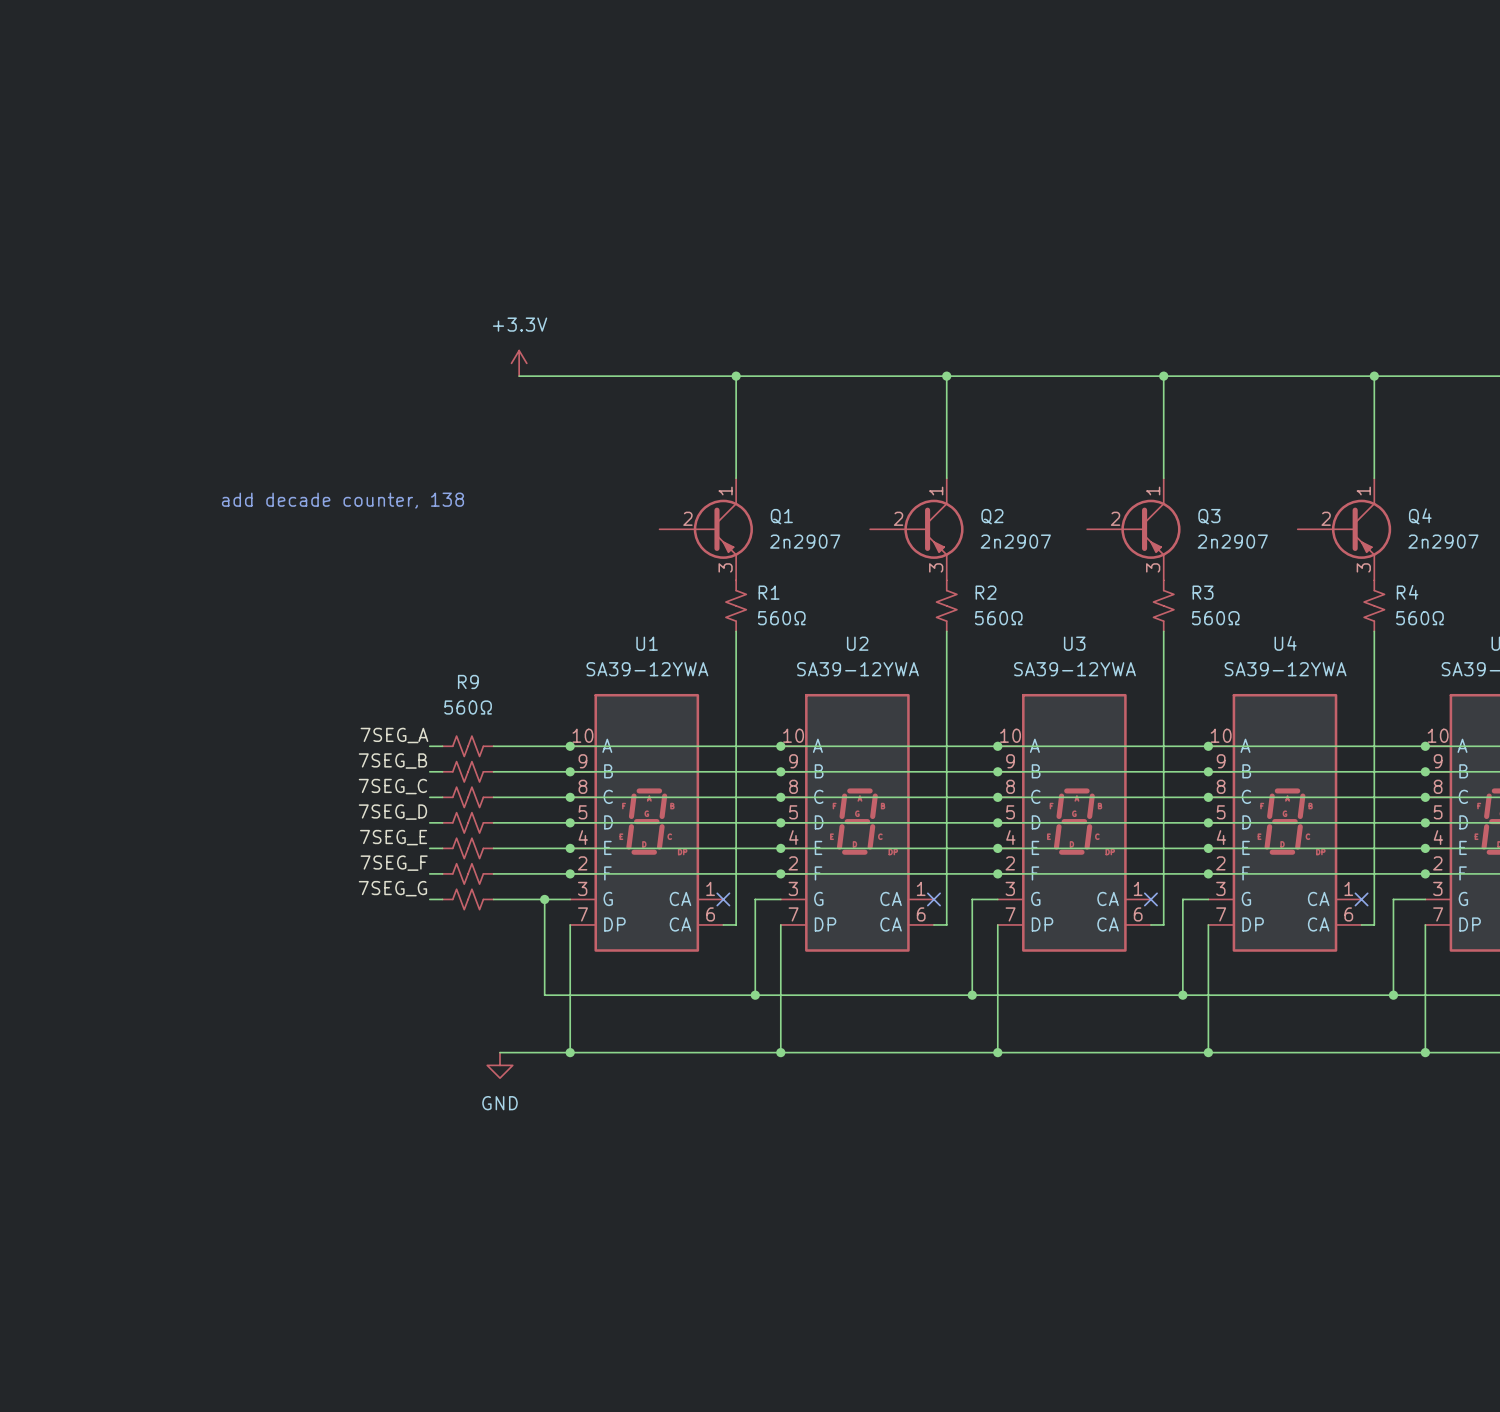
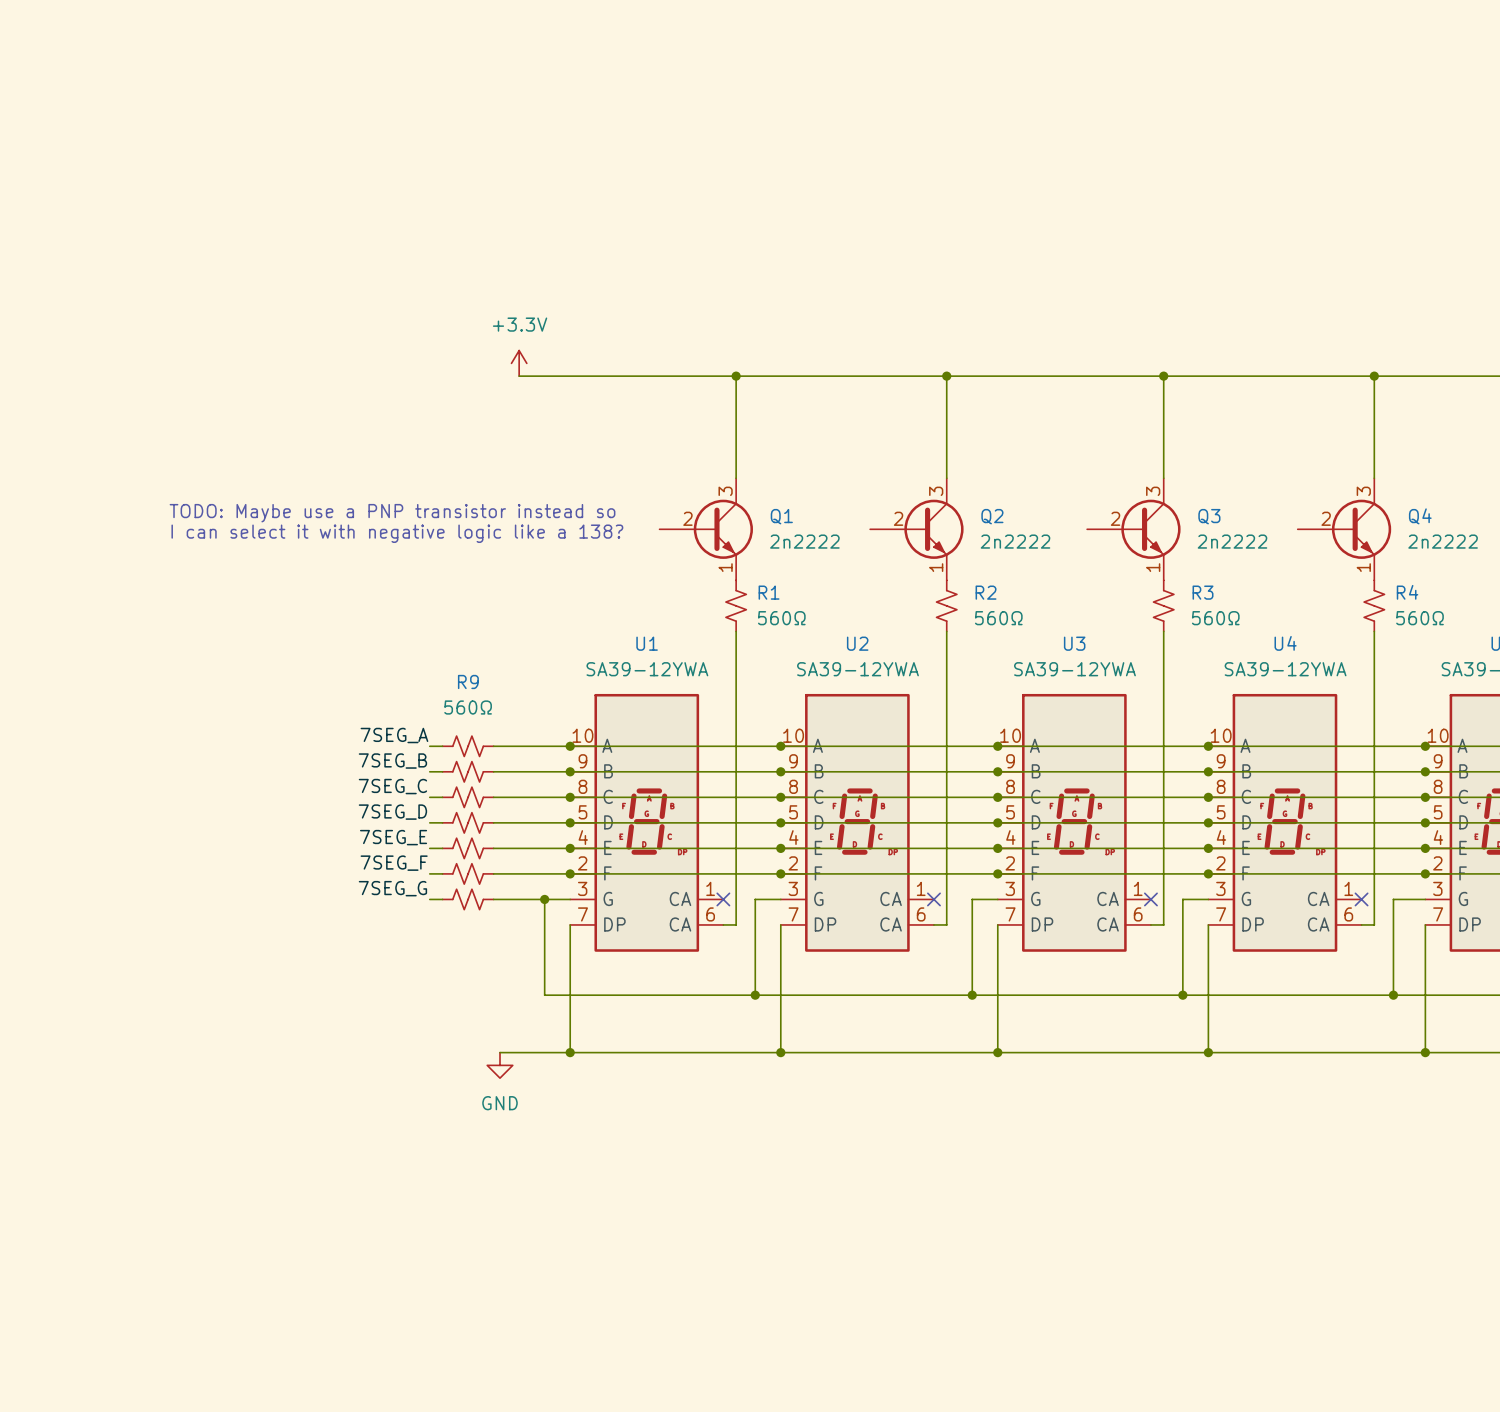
Q1 symbol: [659, 478, 753, 581] -> [659, 478, 753, 581]
Q2 symbol: [870, 478, 964, 581] -> [870, 478, 964, 581]
Q3 symbol: [1087, 478, 1181, 581] -> [1087, 478, 1181, 581]
Q4 symbol: [1297, 478, 1392, 581] -> [1297, 478, 1392, 581]
text: add decade counter, 138 (342, 500) -> none
text: none -> TODO: Maybe use a PNP transistor instead so (392, 513)
text: none -> I can select it with negative logic like a 138? (397, 533)
Q1 value: 2n2907 (805, 541) -> 2n2222 (804, 541)
Q2 value: 2n2907 (1015, 541) -> 2n2222 (1015, 541)
Q3 value: 2n2907 (1232, 541) -> 2n2222 (1232, 541)
Q4 value: 2n2907 (1443, 541) -> 2n2222 (1443, 541)

